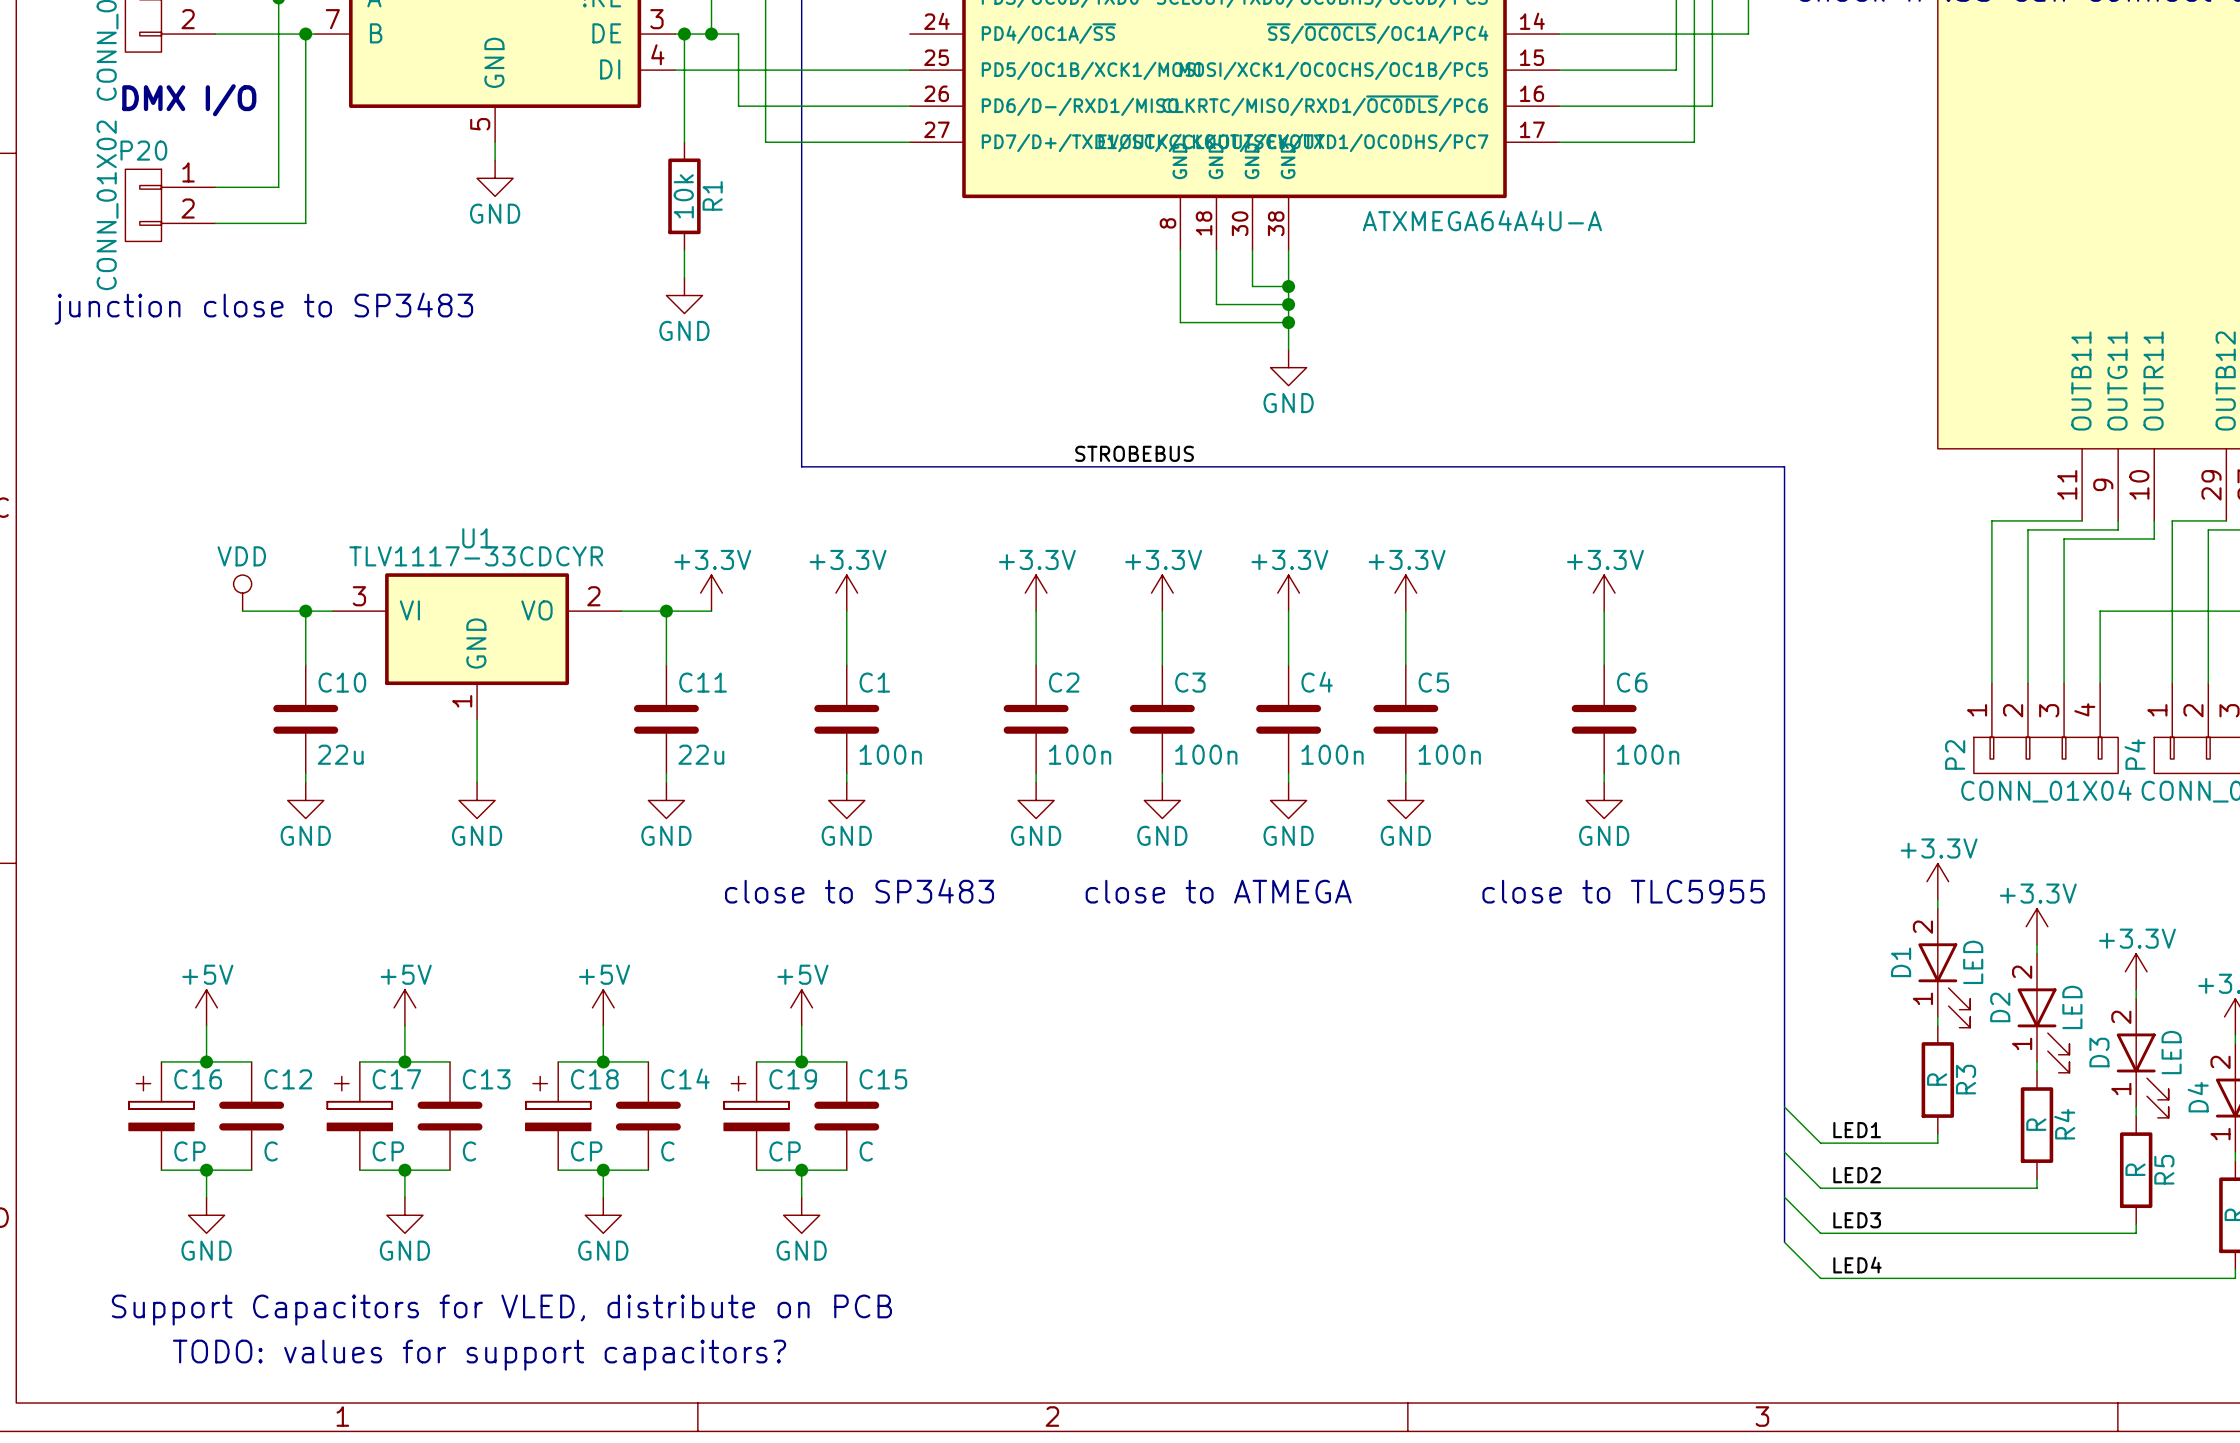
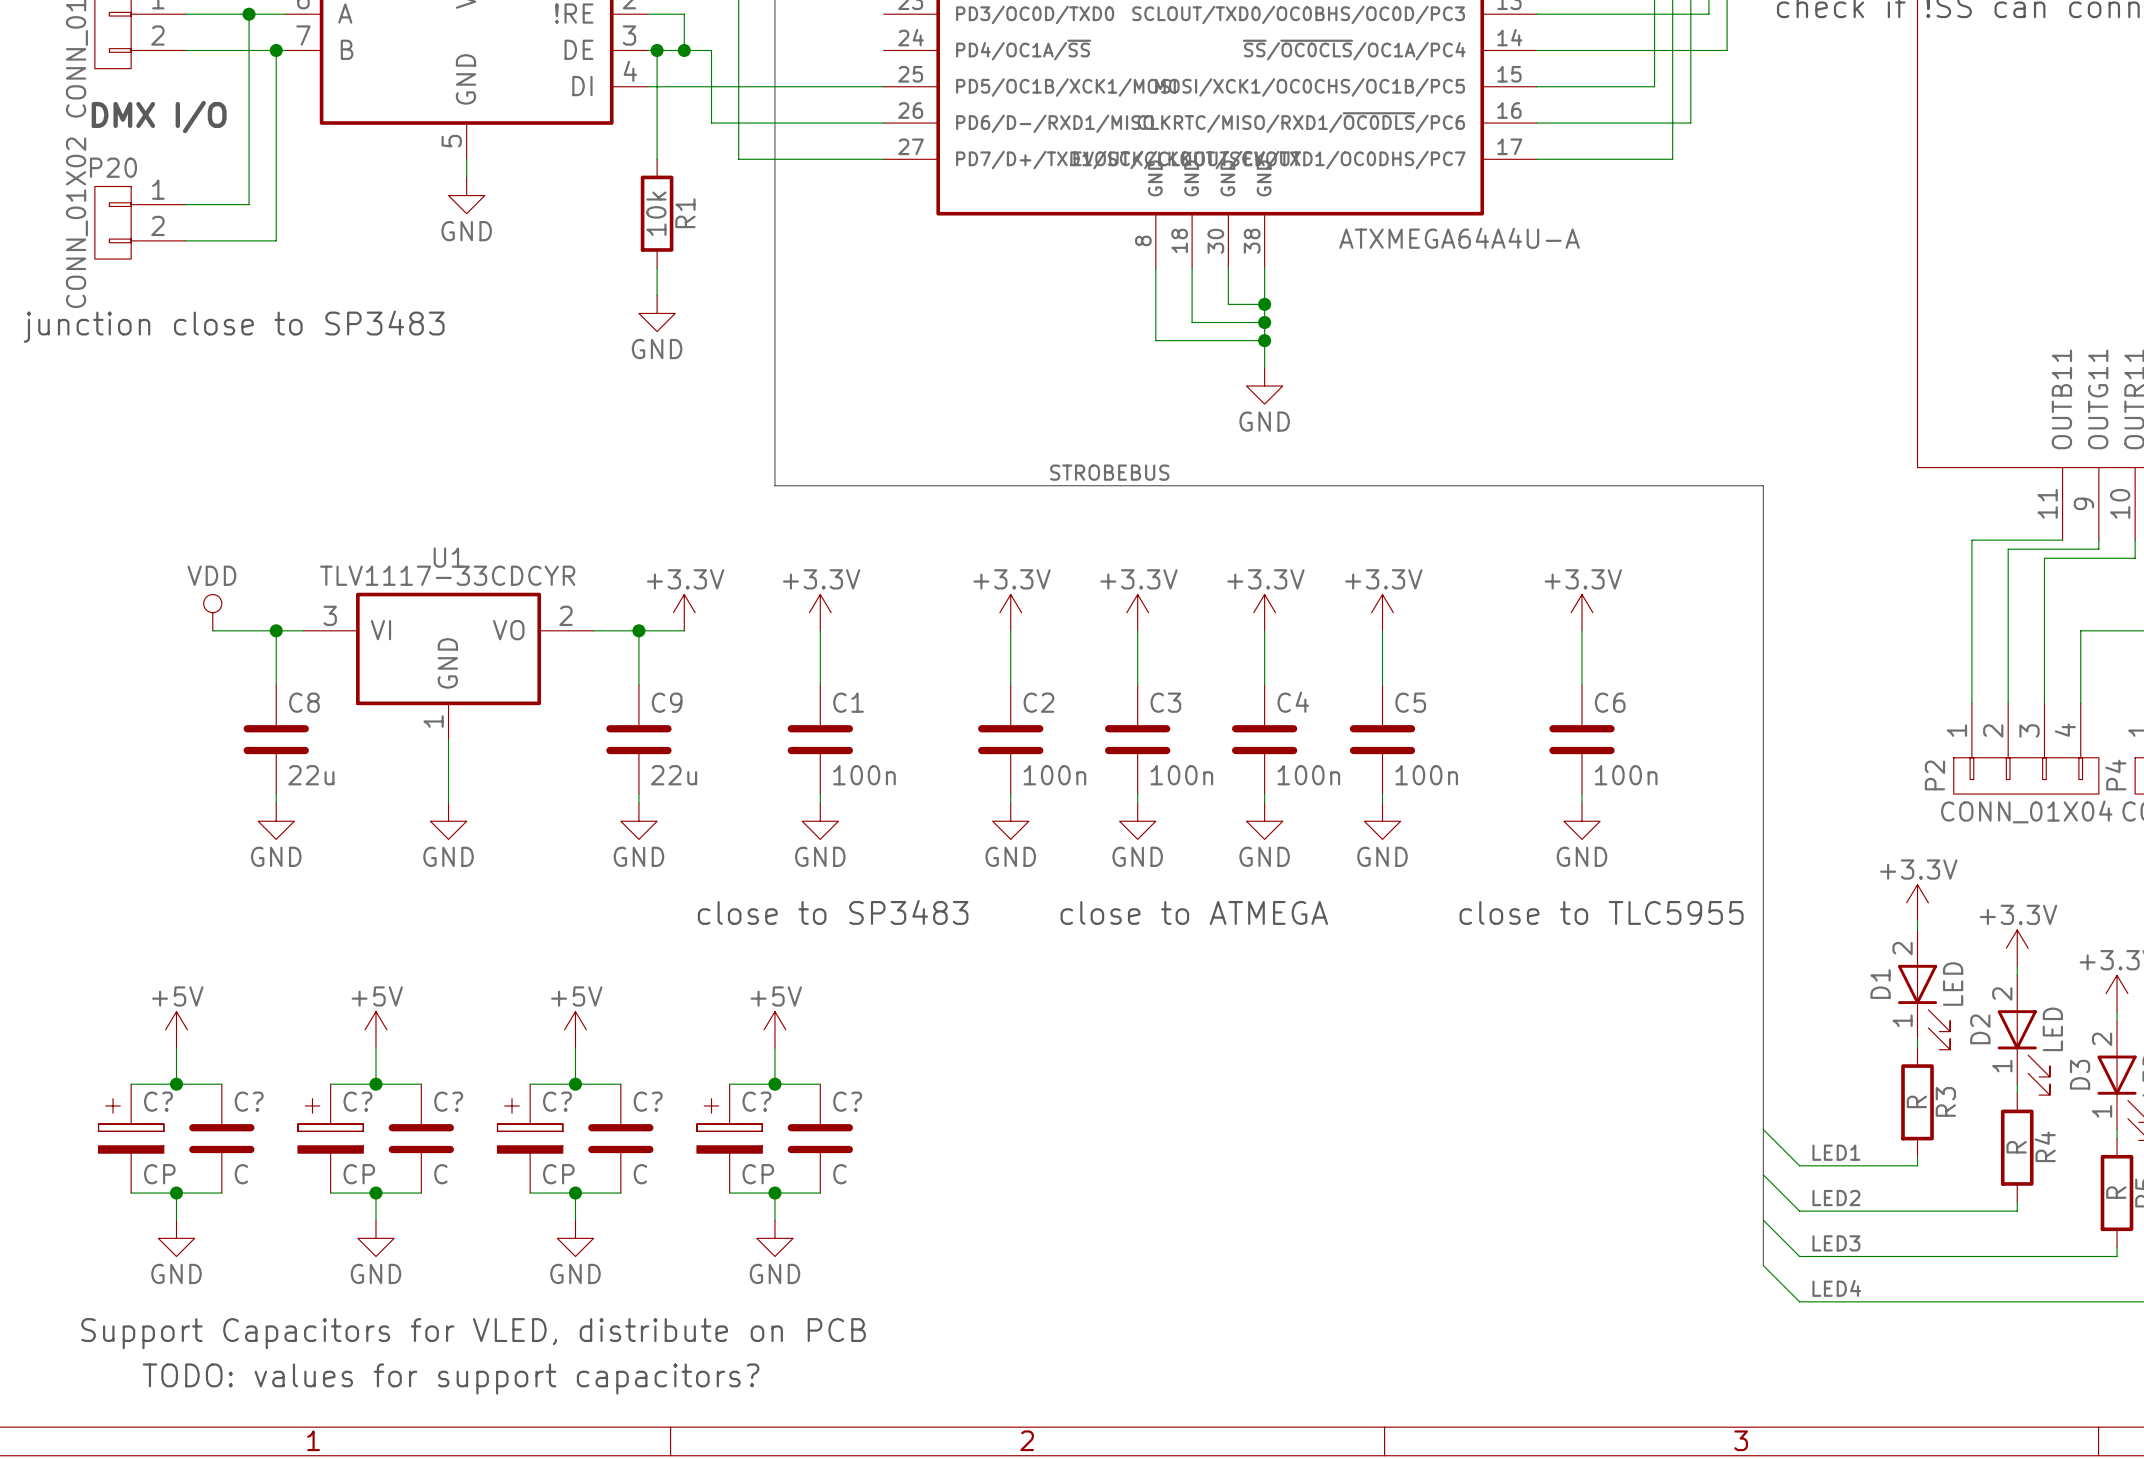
C10 name: C10 (342, 682) -> C8 (304, 702)
C11 name: C11 (703, 682) -> C9 (667, 702)
C14 name: C14 (685, 1078) -> C? (648, 1101)
C16 name: C16 (198, 1079) -> C? (158, 1101)
C12 name: C12 (288, 1079) -> C? (249, 1101)
C17 name: C17 (396, 1079) -> C? (357, 1101)
C13 name: C13 (486, 1079) -> C? (448, 1101)
C18 name: C18 (594, 1079) -> C? (557, 1101)
C19 name: C19 (793, 1079) -> C? (756, 1101)
C15 name: C15 (883, 1079) -> C? (847, 1101)

